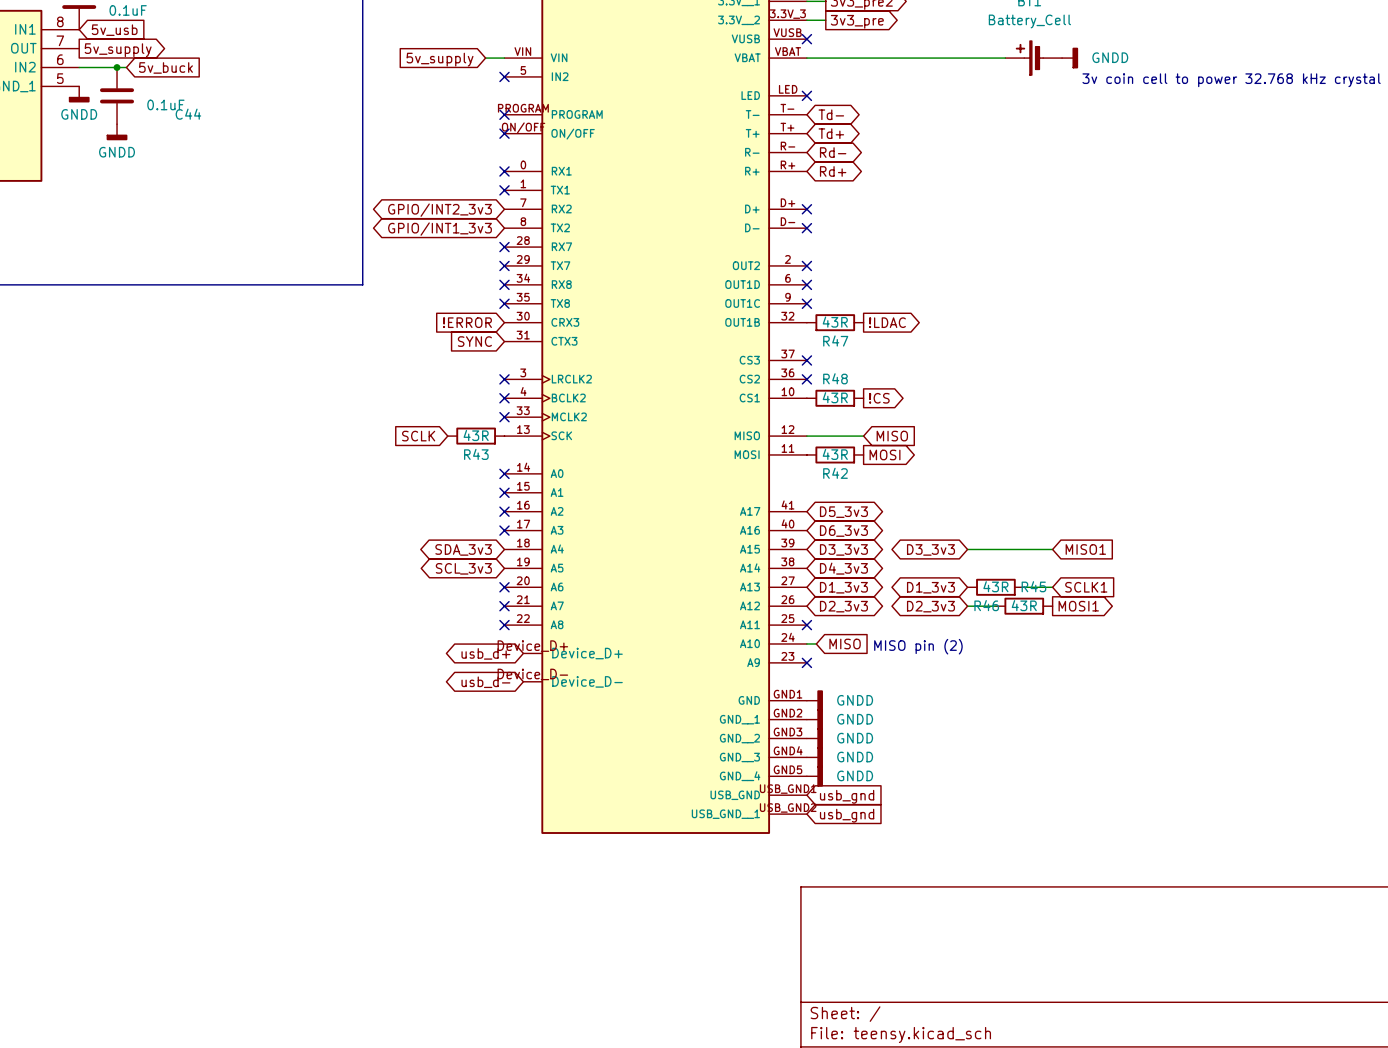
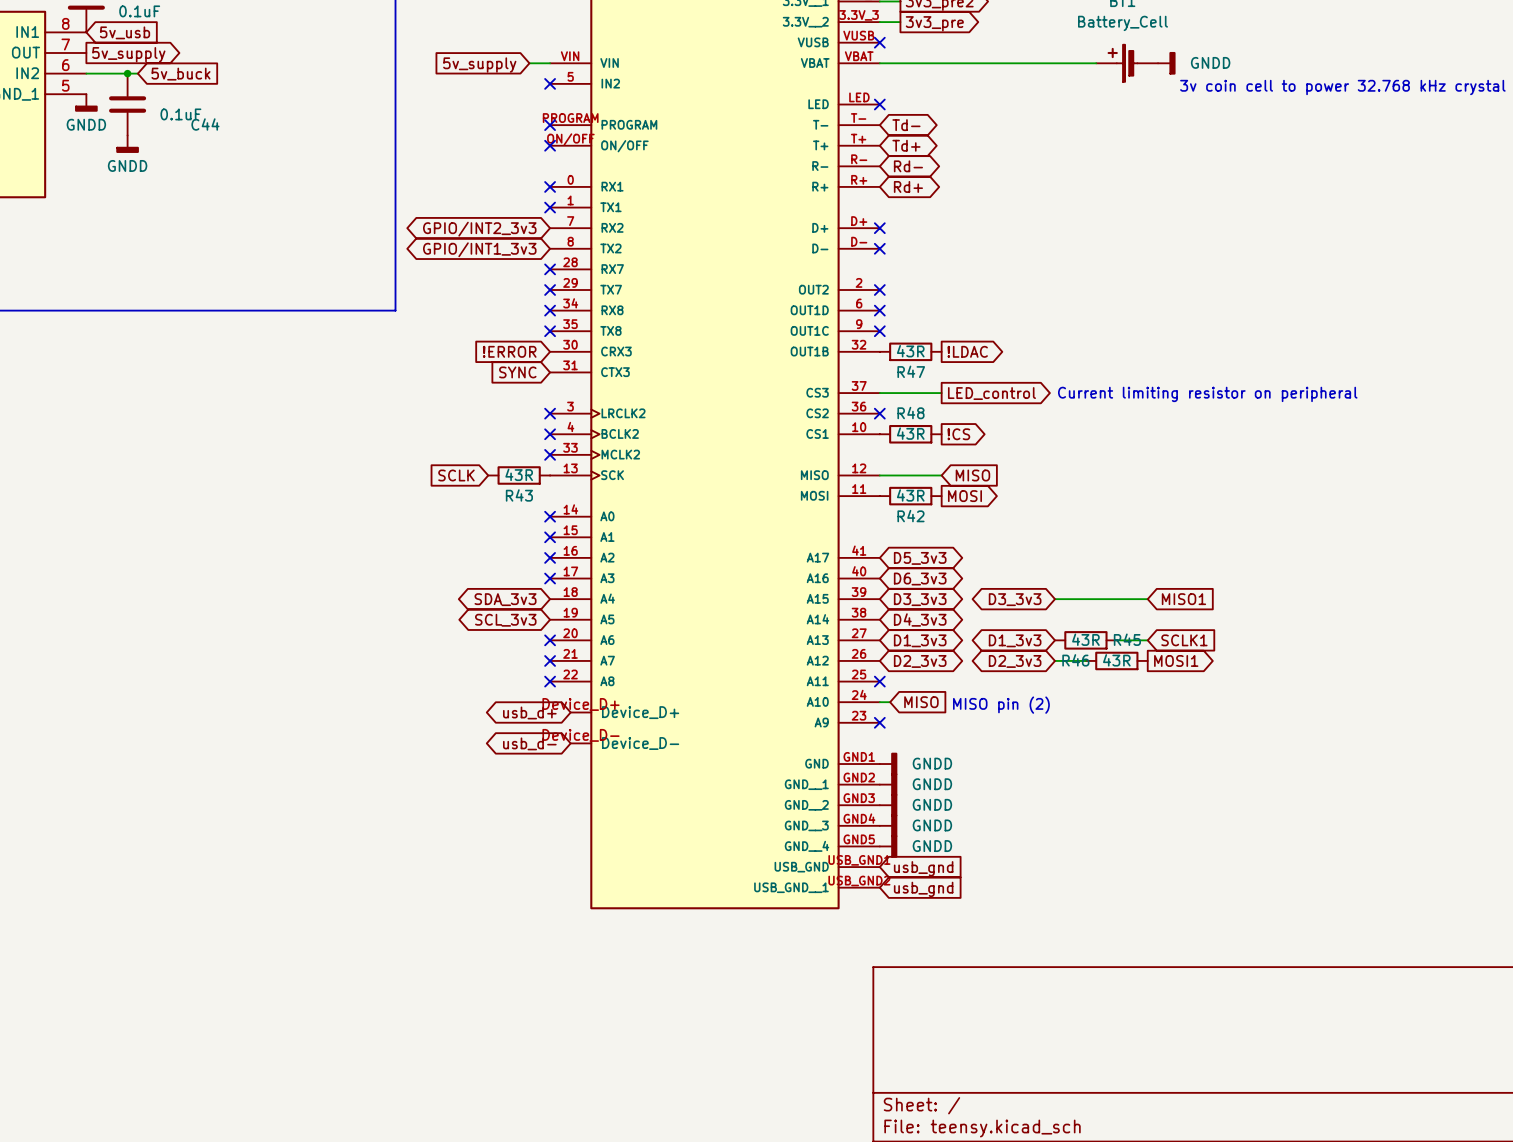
wire: none -> (879, 393) (941, 393)
no-connect mark: (806, 360) -> none
global label: none -> LED_control (991, 393)
text: none -> Current limiting resistor on peripheral (1207, 394)

